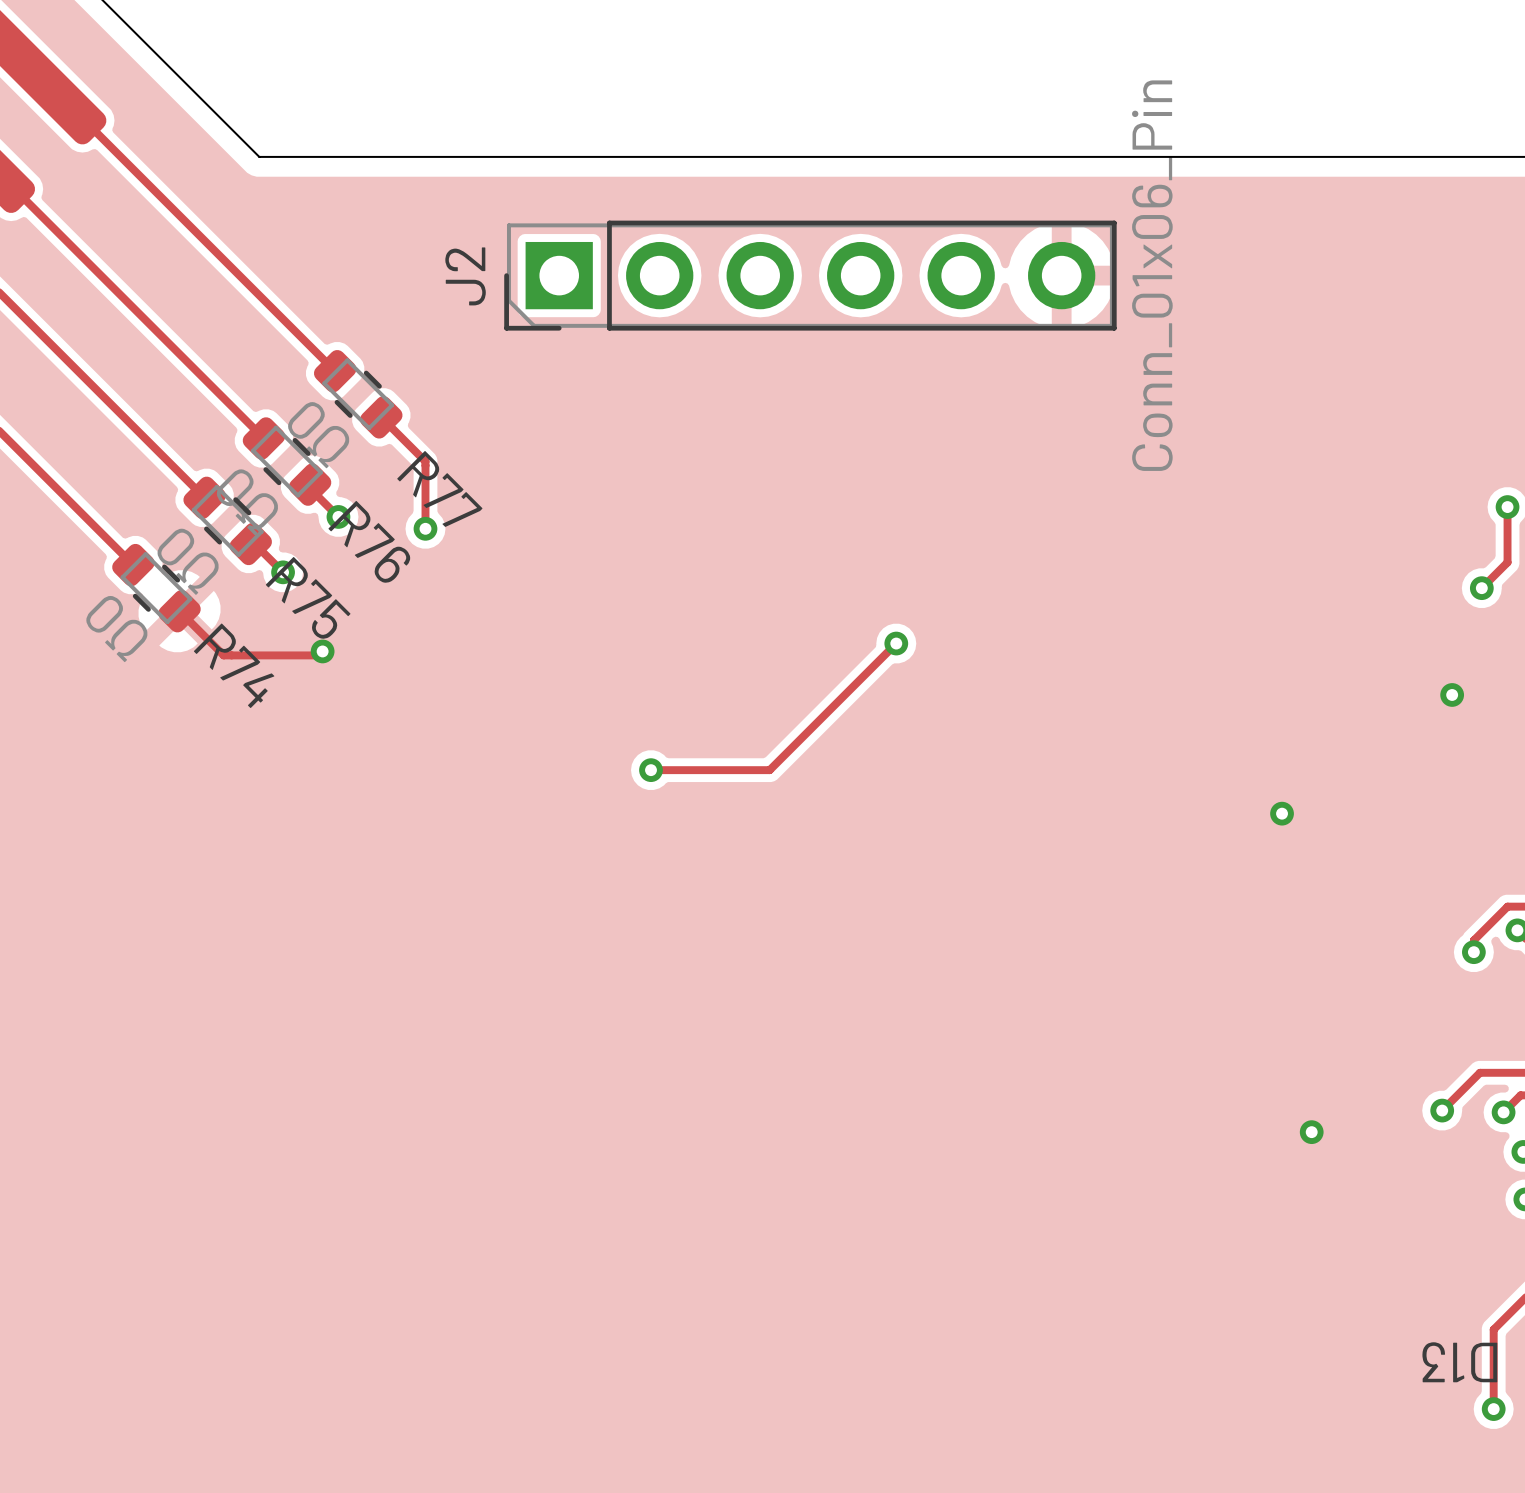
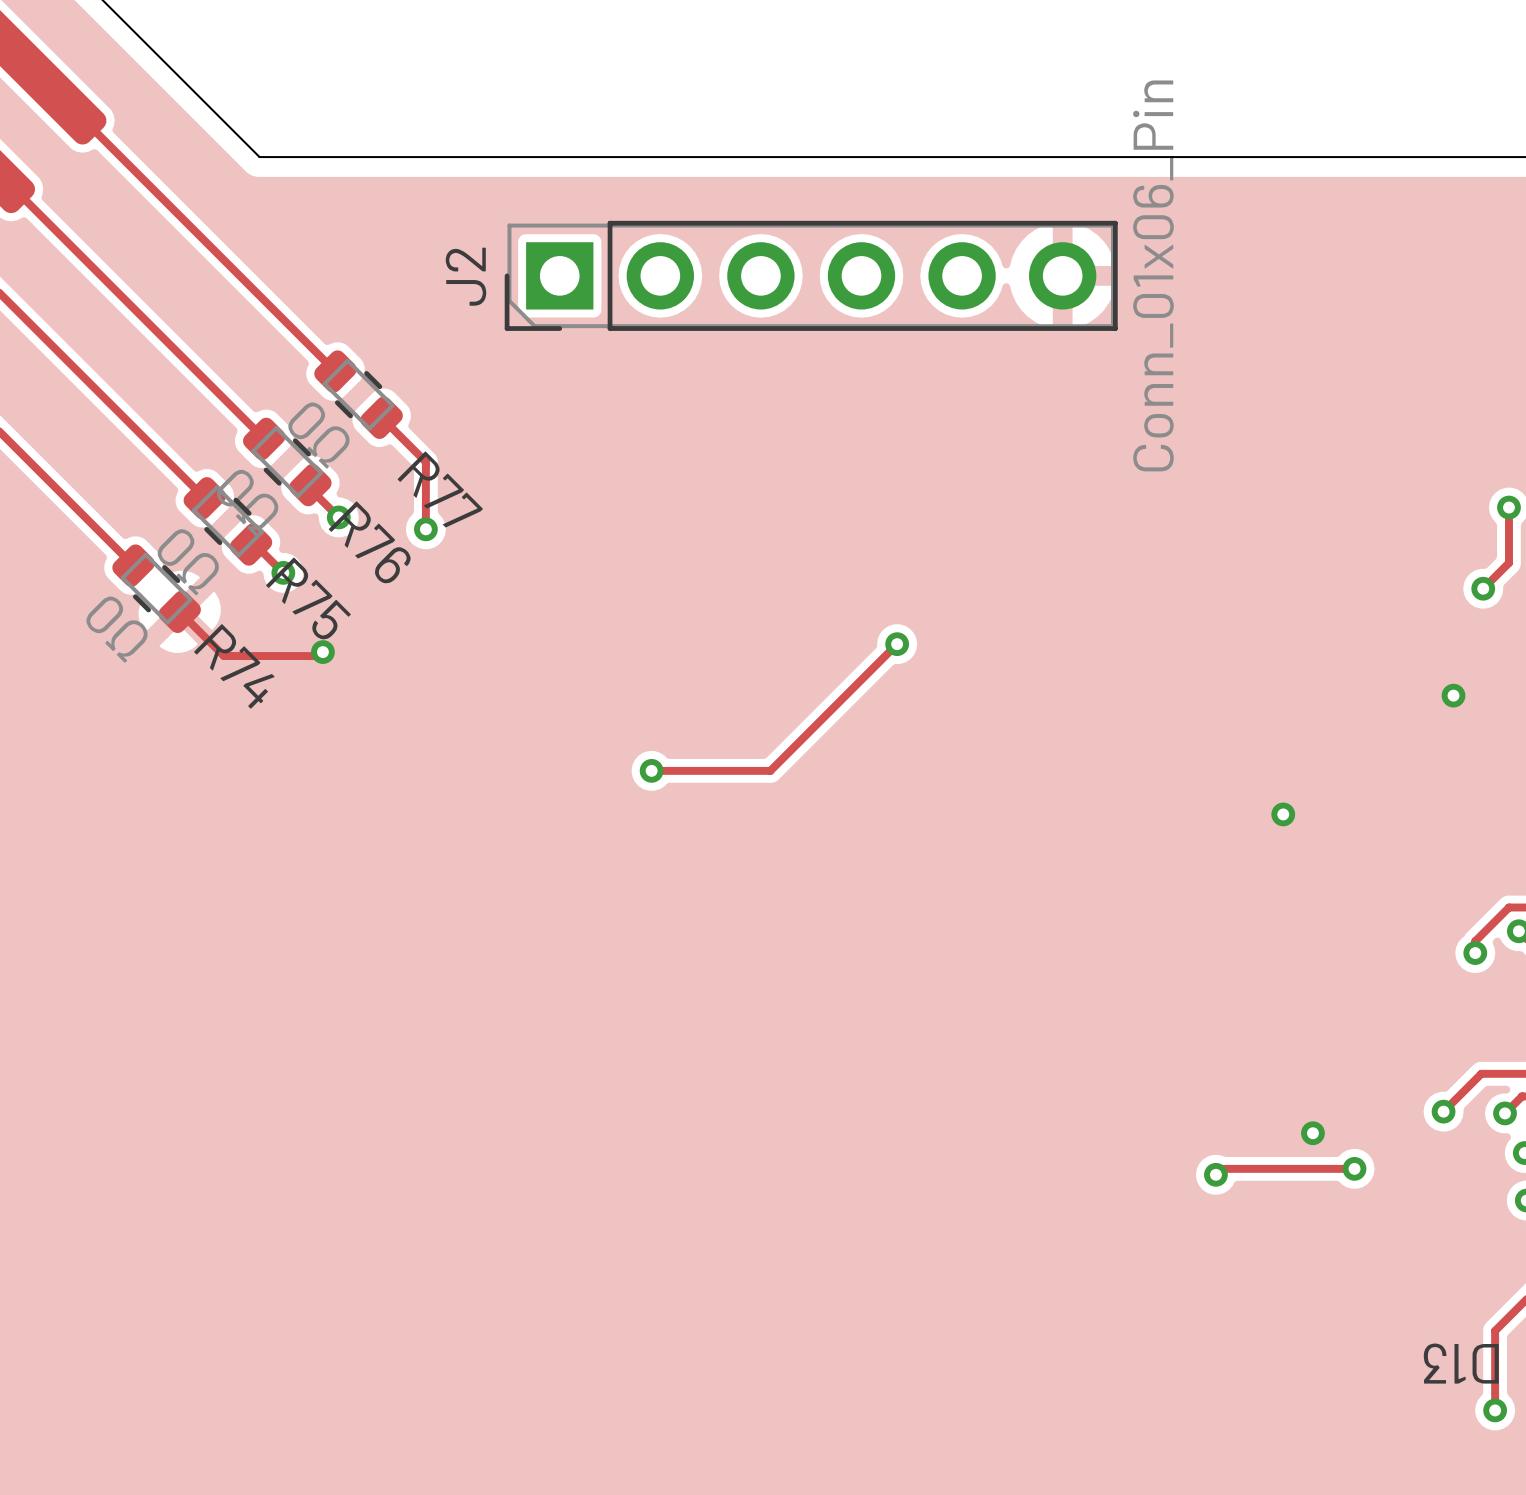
track: none -> (1354, 1168) (1221, 1168) (1215, 1174)
via: none -> (1354, 1168)
via: none -> (1215, 1174)

